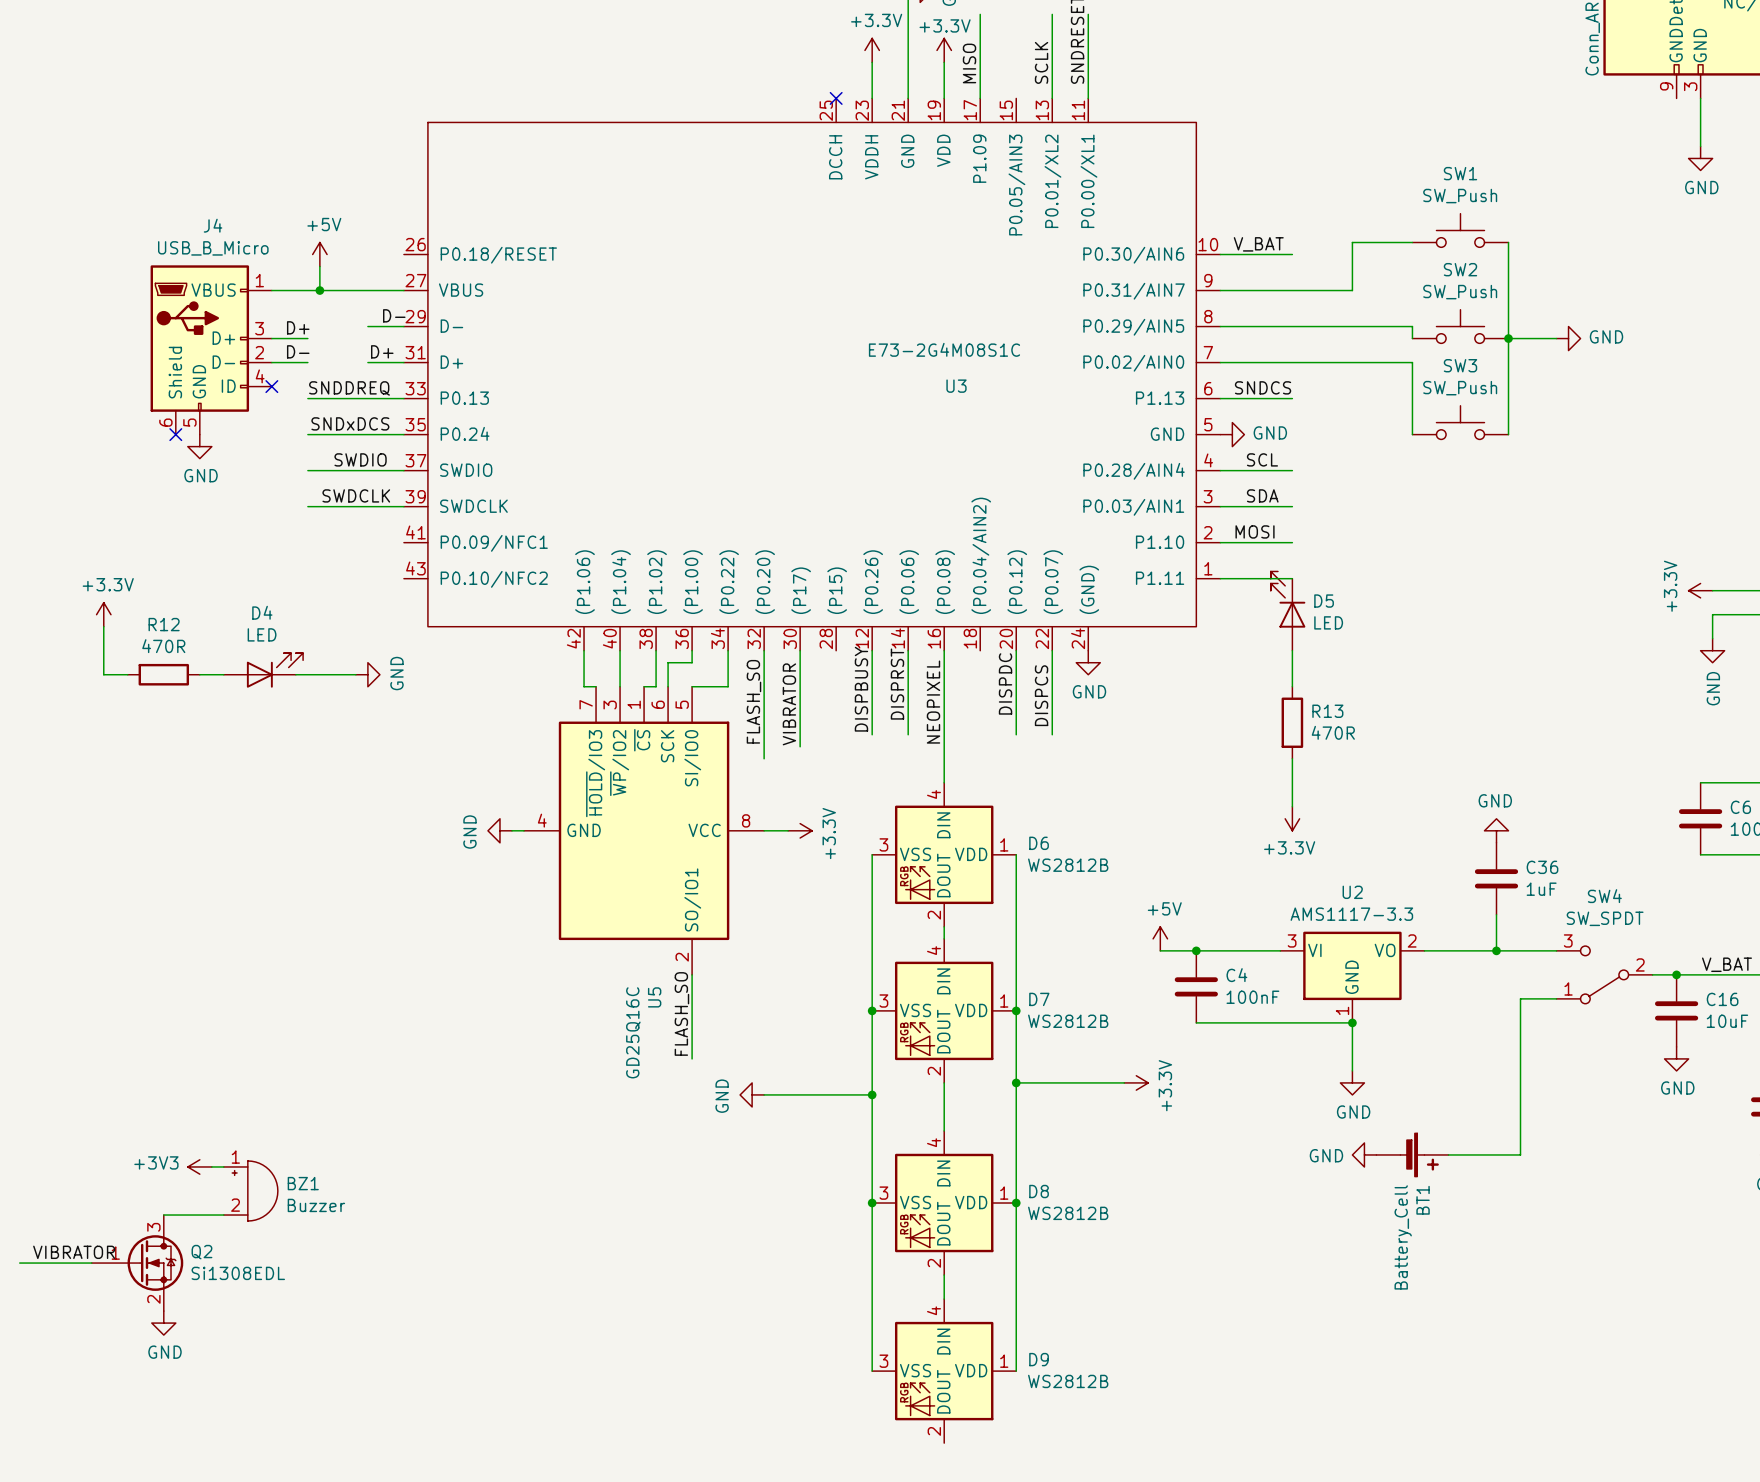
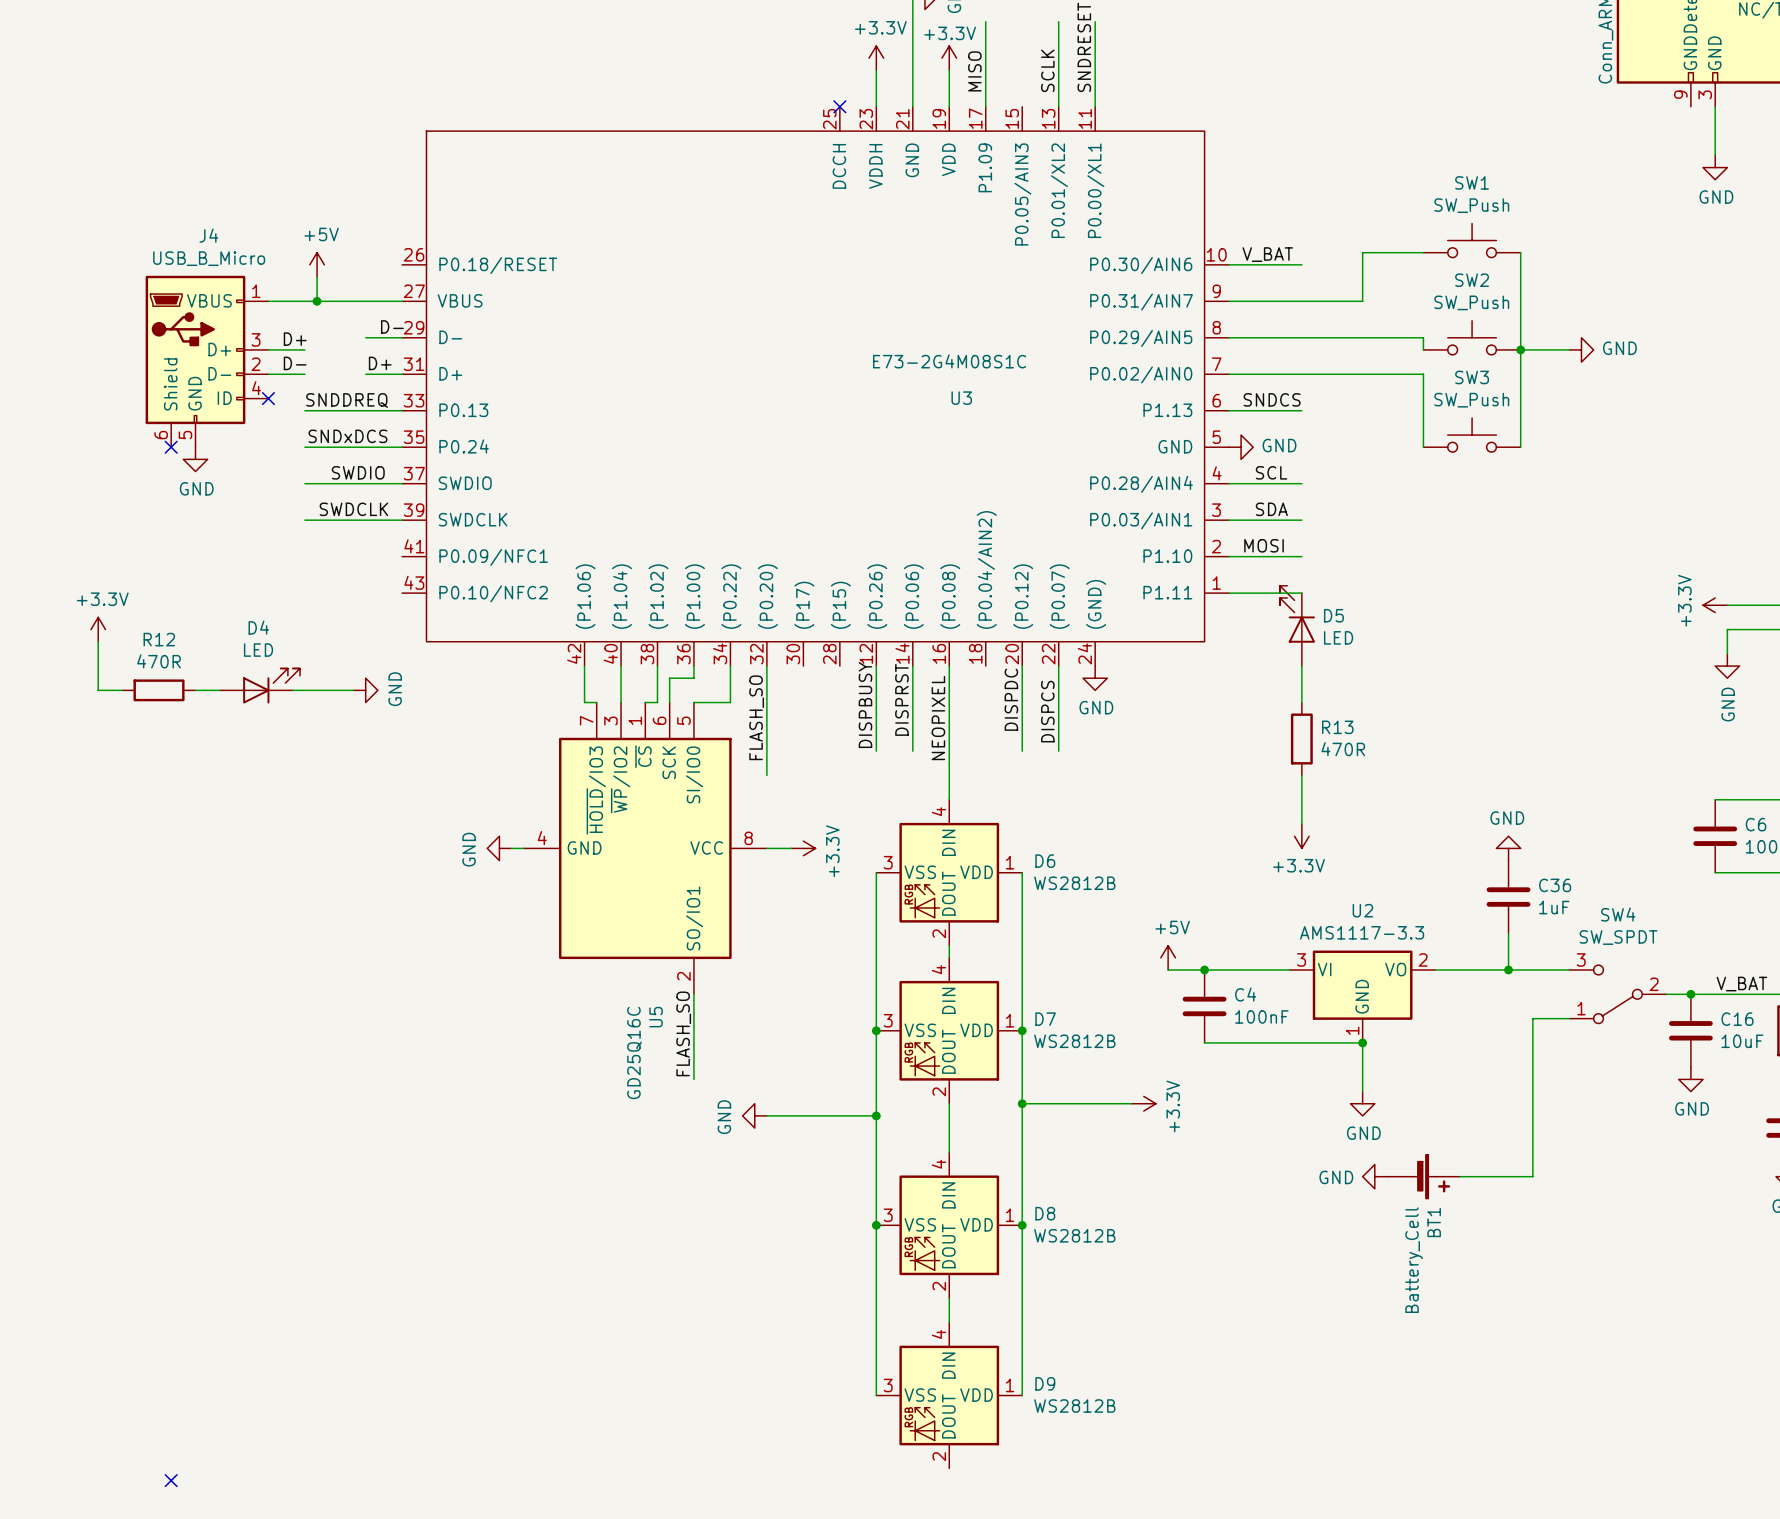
wire: (800, 650) (800, 746) -> none
label: VIBRATOR (789, 704) -> none
power symbol: +3V3 (199, 1166) -> none
wire: (211, 1166) (223, 1166) -> none
BZ1: Buzzer (250, 1191) -> none
wire: (163, 1215) (223, 1215) -> none
label: VIBRATOR (74, 1252) -> none
wire: (19, 1263) (91, 1263) -> none
Q2: Si1308EDL (137, 1263) -> none
power symbol: GND (163, 1323) -> none
no-connect mark: none -> (171, 1480)

